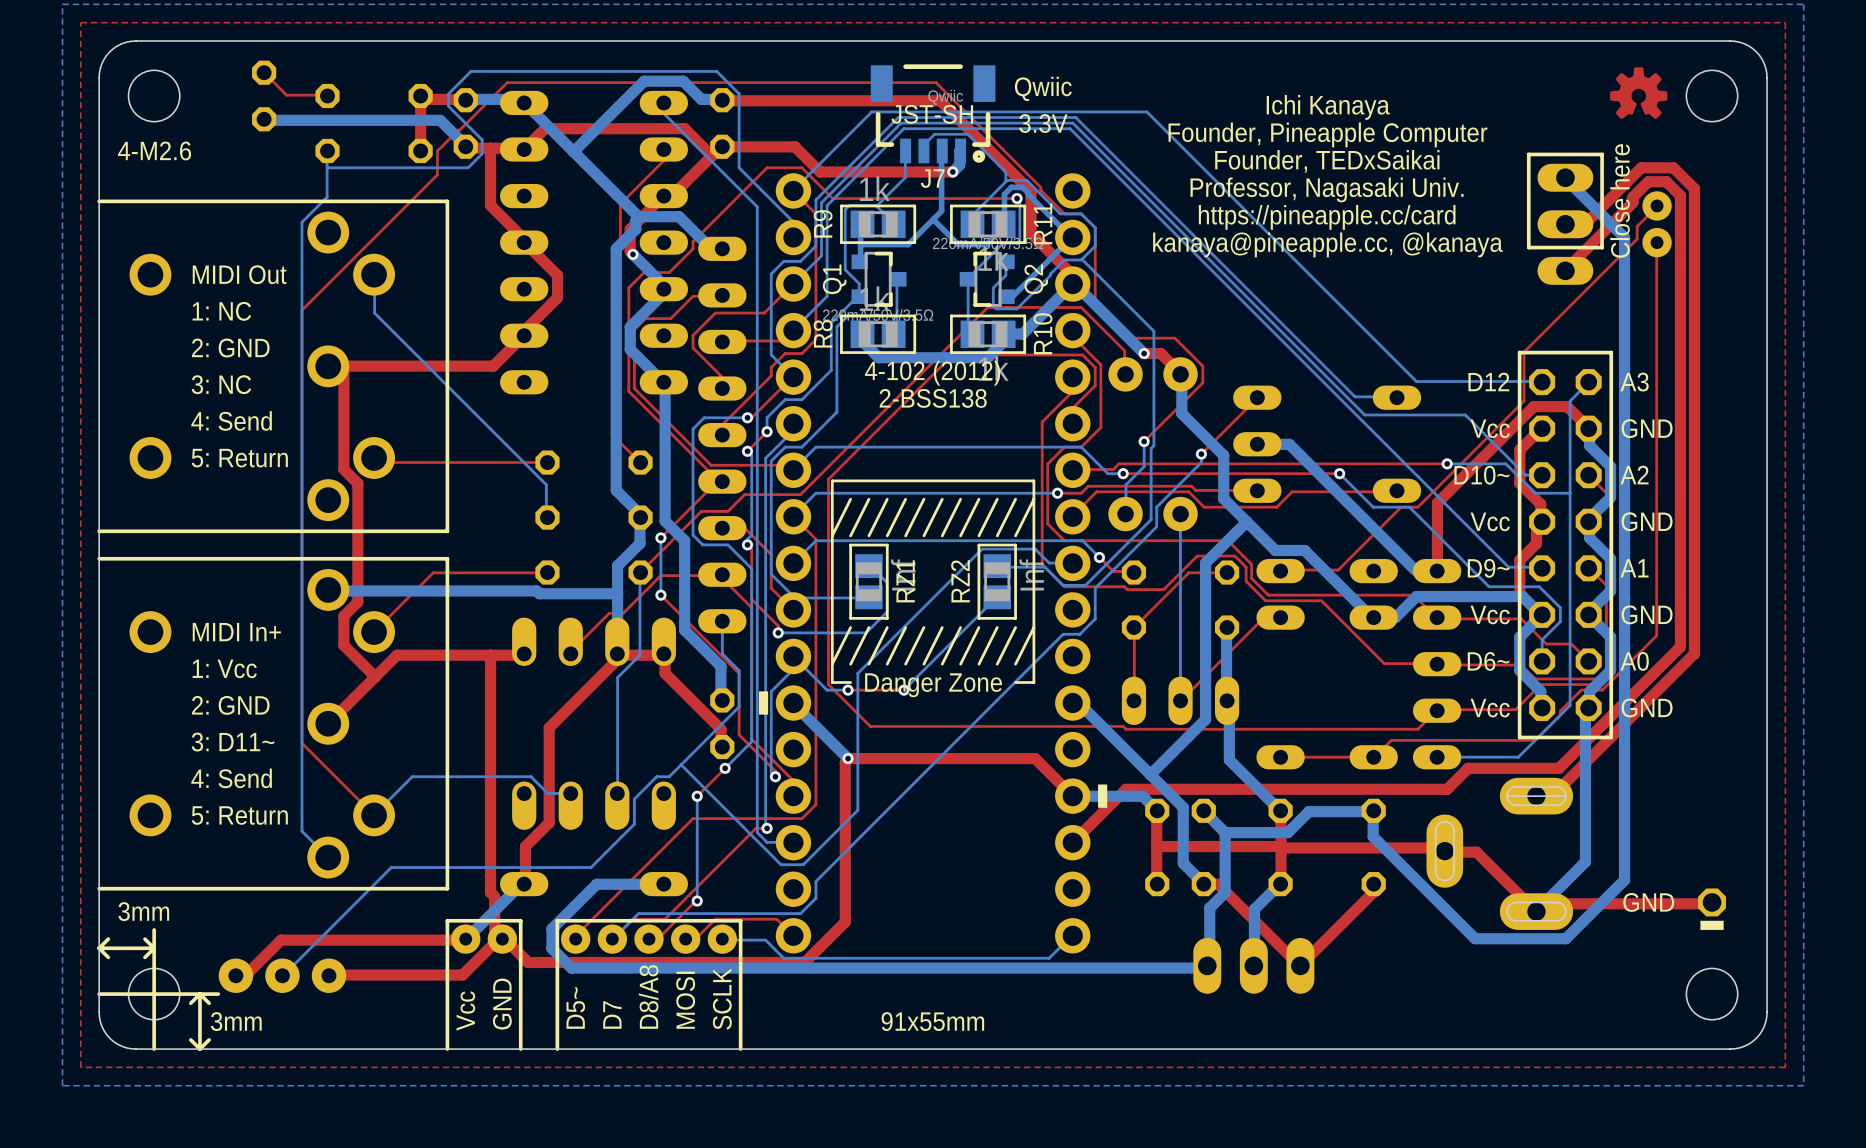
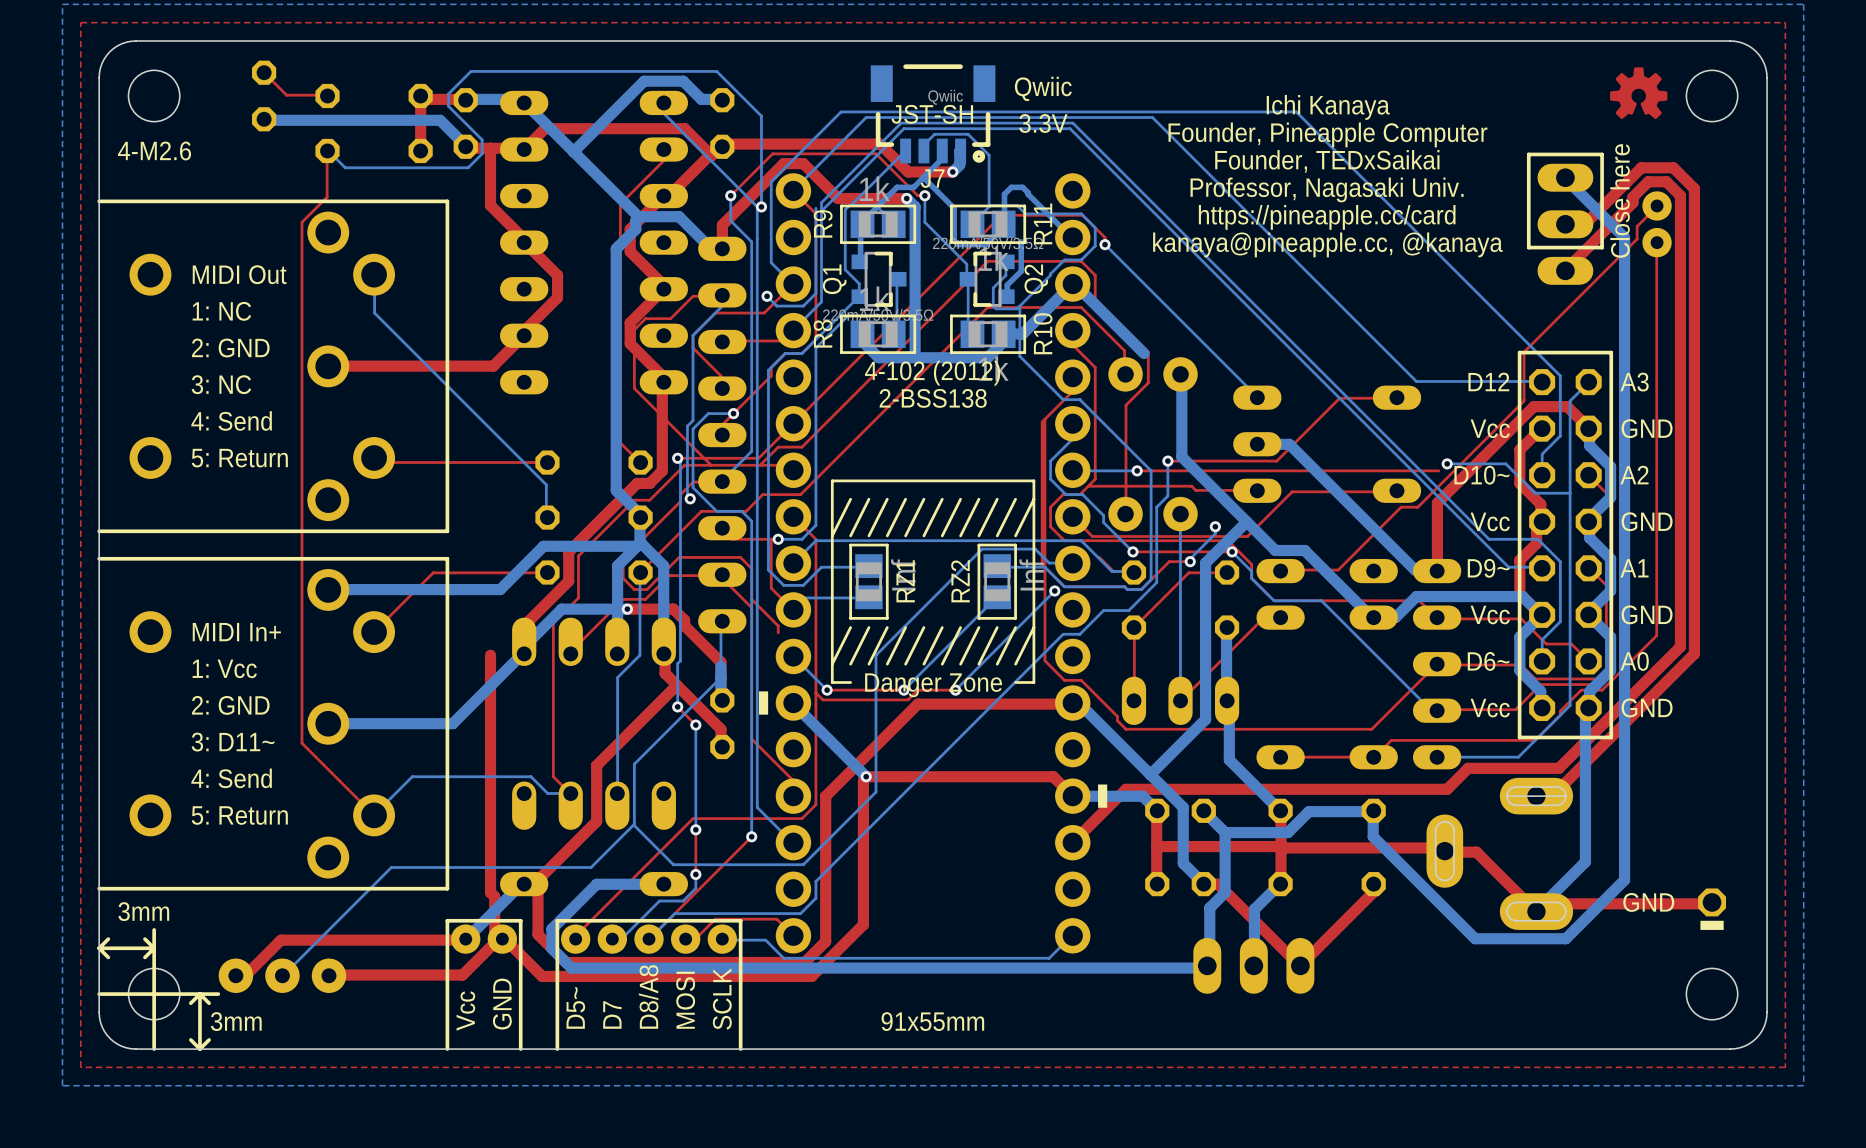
bottom track: (739, 93) (739, 167) (792, 220) (793, 237) -> (739, 93) (761, 116) (761, 206)
top track: (722, 100) (940, 100) (1031, 191) (1031, 233) (1071, 273) (1072, 284) -> none
bottom track: (871, 111) (866, 117) -> (898, 117) (866, 117)
bottom track: none -> (871, 111) (841, 111) (771, 181) (771, 262) (793, 284)
bottom track: (1146, 111) (1152, 117) -> (1075, 117) (1152, 117)
bottom track: (898, 117) (815, 199) (815, 208) -> none
bottom track: (1075, 117) (1355, 396) (1396, 397) -> none
bottom track: (327, 150) (327, 197) (301, 222) (301, 831) (328, 857) -> none
top track: none -> (327, 150) (327, 197) (301, 222) (301, 310)
bottom track: (905, 151) (905, 177) (876, 206) -> (905, 151) (850, 205)
bottom track: (989, 155) (1005, 171) (1006, 181) -> (989, 155) (989, 206)
bottom track: (941, 159) (941, 211) (908, 244) (860, 244) -> (941, 159) (913, 187) (896, 187) (862, 222) (862, 224)
bottom track: (345, 167) (327, 167) -> (345, 167) (327, 150)
top track: (908, 171) (820, 171) (794, 146) (722, 146) (672, 195) (669, 195) -> (908, 171) (880, 144) (723, 144) (722, 146) (716, 148) (669, 195)
bottom track: none -> (730, 195) (730, 220) (751, 241) (751, 451) (722, 481)
via: none -> (730, 195)
top track: none -> (924, 195) (917, 195) (875, 153) (772, 153) (730, 195)
via: none -> (924, 195)
top track: (838, 198) (832, 198) (801, 167) (767, 167) (693, 241) (693, 248) (669, 272) (644, 272) (628, 287) (628, 391) (718, 480) (660, 537) -> (838, 198) (803, 163) (783, 163) (722, 225) (722, 248)
bottom track: none -> (906, 198) (915, 206) (915, 357)
top track width: thin (906, 198) (838, 198) -> thick (906, 198) (838, 198)
via: none -> (906, 198)
bottom track: (1017, 198) (1019, 201) (1019, 240) (1017, 243) (1003, 243) (967, 279) -> (924, 195) (924, 222) (966, 264) (967, 279)
top track: (1017, 198) (906, 198) -> none
via: (1017, 198) -> none
bottom track: (827, 205) (827, 296) (821, 301) -> (827, 205) (821, 211)
via: none -> (761, 206)
bottom track: (1060, 213) (1026, 180) (1007, 180) (973, 213) (972, 224) -> (1060, 213) (1025, 213) (1017, 205) (990, 205) (972, 224)
top track: (1082, 215) (1064, 213) (1040, 190) (1040, 187) (936, 82) (507, 82) (437, 151) (437, 174) (301, 310) -> (1082, 215) (1001, 215) (793, 423)
bottom track: (933, 219) (954, 240) -> (923, 177) (954, 208) (954, 240)
top track: (1095, 227) (1095, 275) -> (1095, 227) (1105, 237) (1105, 244)
bottom track: (1068, 240) (1012, 296) (1007, 296) -> (1021, 241) (1021, 271) (1007, 285) (1007, 296)
bottom track: none -> (1105, 244) (1257, 397)
via: none -> (1105, 244)
bottom track: (815, 246) (800, 261) (783, 261) (771, 273) (771, 354) (793, 377) -> (815, 246) (815, 293) (803, 306) (776, 306) (767, 296)
bottom track: (632, 254) (662, 283) (663, 289) -> none
top track: none -> (632, 254) (662, 283) (663, 289)
via: (632, 254) -> none
bottom track: (821, 255) (793, 283) -> (821, 255) (821, 301)
bottom track: (1081, 259) (1153, 331) (1153, 445) (1151, 448) (1151, 470) -> (1019, 306) (1019, 356) (1063, 399) (1079, 399) (1151, 470)
top track: none -> (1095, 275) (1081, 261) (987, 261) (801, 447) (778, 447) (760, 465)
bottom track: (663, 289) (663, 293) (630, 327) (630, 349) (665, 382) (665, 521) (684, 540) (684, 630) (720, 666) -> (722, 621) (720, 666)
bottom track: none -> (722, 295) (720, 307) (693, 335) (693, 420) (687, 426) (687, 496) (690, 498)
via: none -> (767, 296)
bottom track: (859, 296) (857, 296) (831, 322) (831, 370) (801, 399) (785, 399) (767, 417) (767, 431) -> (859, 296) (801, 353) (785, 353) (768, 370) (768, 570) (783, 585) (803, 585) (821, 567) (868, 566)
bottom track: (836, 327) (836, 412) (801, 447) (785, 447) (771, 461) (771, 574) (799, 602) (793, 609) -> (836, 327) (815, 347) (815, 525) (801, 539) (778, 539)
top track: (1072, 336) (1100, 364) (1100, 427) (1081, 447) (1064, 447) (1047, 463) (1047, 523) (1050, 526) -> (1072, 336) (1072, 345) (1082, 354)
top track: (1134, 338) (1174, 338) (1202, 366) (1202, 382) (1144, 441) -> (1134, 338) (1148, 352) (1148, 382) (1125, 405) (1125, 514)
top track: (1144, 353) (1160, 353) (1180, 374) -> none
via: (1144, 353) -> none
top track: (1082, 354) (952, 354) (828, 479) (828, 684) (870, 726) (1123, 726) -> (1044, 419) (1044, 660) (1064, 680) (1081, 680) (1117, 716) (1117, 720) (1123, 726)
top track: (328, 366) (343, 370) (343, 469) (357, 483) (357, 602) (343, 616) (343, 645) (375, 676) -> none
top track: (792, 377) (751, 417) (747, 417) -> none
top track: (1095, 385) (1072, 408) (1072, 423) -> (1095, 385) (1095, 479) (1088, 486)
top track: (1257, 397) (1201, 454) -> none
top track: none -> (1396, 397) (1339, 398) (1276, 461) (1167, 461)
bottom track: (1181, 413) (1223, 455) (1223, 498) -> (1181, 413) (1181, 456) (1223, 498)
bottom track: (1364, 415) (1465, 415) (1525, 475) (1542, 475) -> (1146, 111) (1296, 111) (1560, 375) (1560, 435) (1542, 454) (1542, 475)
bottom track: (747, 417) (704, 417) -> (733, 413) (708, 413) (704, 417)
via position: (747, 417) -> (733, 413)
bottom track: (793, 423) (792, 431) (765, 458) (767, 828) -> none
top track: none -> (793, 423) (758, 458) (677, 458)
bottom track: none -> (1072, 423) (1071, 440) (1050, 461) (1050, 479) (1065, 494) (1082, 494) (1103, 515) (1103, 522) (1132, 551)
top track: (767, 431) (747, 451) -> none
via: (767, 431) -> none
bottom track: (1144, 441) (1144, 466) (1125, 484) (1125, 514) -> none
via: (1144, 441) -> none
bottom track: (747, 451) (751, 455) (751, 521) -> none
via: (747, 451) -> none
bottom track: (1201, 454) (1201, 462) (1167, 496) -> (1167, 461) (1167, 496)
via: (1201, 454) -> none
bottom track: none -> (677, 458) (680, 461) (680, 660) (677, 663) (677, 706)
via: none -> (677, 458)
via: none -> (1167, 461)
top track: (1447, 463) (1119, 463) (1113, 469) (1072, 470) -> none
top track: none -> (711, 465) (684, 465) (649, 500) (634, 500) (578, 556) (578, 597) (553, 623) (553, 776) (570, 793)
bottom track: (793, 470) (815, 447) (1081, 447) (1107, 473) (1123, 473) -> none
bottom track: none -> (1072, 470) (1137, 470)
top track: none -> (1438, 470) (1137, 470)
via position: (1123, 473) -> (1137, 470)
bottom track: (1339, 473) (1373, 507) (1409, 507) (1489, 586) (1539, 586) (1560, 607) -> (1364, 415) (1489, 539) (1537, 539) (1560, 561) (1560, 607)
top track: (1339, 473) (1123, 473) -> none
via: (1339, 473) -> none
top track: none -> (722, 481) (693, 482) (680, 494) (680, 501) (623, 558) (623, 578) (634, 589) (646, 589)
bottom track: (693, 487) (693, 535) (702, 544) (727, 544) (751, 568) -> (693, 487) (716, 511) (741, 511) (751, 521)
bottom track: (1057, 493) (815, 493) (793, 516) -> none
via: (1057, 493) -> none
top track: (1081, 493) (1057, 493) -> (1081, 493) (1063, 494) (1050, 507) (1050, 526)
top track: (762, 494) (744, 494) (727, 511) -> (762, 494) (746, 511) (727, 511)
via: none -> (690, 498)
top track: (1276, 507) (1204, 507) (1188, 491) (1096, 491) (1072, 516) -> (1276, 507) (1247, 536) (1092, 536) (1072, 516)
bottom track: (1151, 519) (1085, 585) (1063, 585) -> (1151, 519) (1151, 579) (1141, 589) (1127, 589) (1124, 586) (1063, 585)
bottom track: (1156, 526) (1095, 588) (1095, 618) -> (1156, 526) (1156, 582) (1128, 610) (1103, 610) (1095, 618)
bottom track: none -> (1215, 526) (1215, 533) (1190, 558) (1190, 561)
via: none -> (1215, 526)
top track: (722, 529) (746, 529) (771, 554) -> (722, 529) (732, 539) (778, 539)
bottom track: (751, 535) (747, 539) (747, 544) -> (751, 535) (751, 568)
bottom track: (660, 537) (660, 595) -> none
via: (660, 537) -> none
top track: none -> (771, 539) (771, 554)
bottom track: (1081, 540) (1099, 557) -> (1081, 540) (1112, 571) (1133, 572)
top track: (747, 544) (751, 549) (751, 568) -> none
via position: (747, 544) -> (778, 539)
via: none -> (1132, 551)
bottom track: none -> (1232, 551) (1251, 571) (1251, 578) (1274, 600) (1321, 600) (1430, 709) (1437, 710)
top track: none -> (1232, 551) (1132, 551)
via: none -> (1232, 551)
via: (1099, 557) -> none
via: none -> (1190, 561)
bottom track: (868, 566) (887, 582) (887, 611) (866, 632) (778, 632) -> none
top track: (669, 575) (660, 575) -> (751, 568) (740, 557) (679, 557) (660, 575)
bottom track: (328, 589) (536, 590) (539, 593) (617, 593) -> (328, 589) (500, 589) (543, 546) (637, 546) (641, 543) (663, 565) (663, 653)
top track: (646, 589) (623, 613) (609, 613) -> (669, 575) (645, 599) (623, 599) (609, 613)
top track: (1141, 589) (1163, 589) (1197, 556) (1234, 556) (1246, 567) (1246, 581) (1265, 600) (1274, 600) -> (1141, 589) (1169, 561) (1190, 561)
bottom track: none -> (1054, 590) (955, 690)
via: none -> (1054, 590)
top track: (660, 595) (739, 673) (739, 734) (775, 771) (775, 776) -> none
via position: (660, 595) -> (627, 609)
top track: (1268, 595) (1413, 595) (1419, 600) -> (1321, 600) (1419, 600)
top track: (1321, 600) (1384, 663) (1437, 664) -> none
bottom track: none -> (627, 609) (561, 609) (525, 645) (525, 653) (519, 656) (452, 723) (328, 723)
top track: none -> (627, 609) (673, 609) (684, 620) (684, 625) (720, 662) (722, 700)
bottom track: (722, 621) (722, 653) (739, 670) (739, 706) (669, 776) (656, 776) (634, 799) -> (720, 677) (634, 764) (634, 799)
via: (778, 632) -> none
top track: (524, 653) (396, 655) (328, 723) -> (524, 653) (525, 624) (568, 581) (568, 551) (637, 483) (649, 483) (662, 470) (663, 377) (630, 343) (630, 322) (663, 289)
top track: (663, 653) (617, 653) (616, 660) (549, 727) (549, 822) (525, 846) (525, 882) -> (676, 685) (596, 765) (596, 821) (535, 882) (525, 882)
bottom track: (875, 655) (857, 673) (857, 810) -> (875, 655) (875, 792) (857, 810)
bottom track: (793, 656) (799, 663) (771, 691) (771, 772) (775, 776) -> none
bottom track: (848, 690) (827, 690) -> none
top track: none -> (848, 690) (827, 690)
via position: (848, 690) -> (827, 690)
top track: none -> (955, 690) (917, 690) (908, 699) (822, 699) (815, 692)
via: none -> (955, 690)
top track: none -> (677, 706) (695, 725)
via: none -> (677, 706)
top track: (1437, 710) (1417, 729) (1371, 729) -> (1437, 664) (1371, 729)
via: none -> (695, 725)
bottom track: (751, 741) (725, 768) -> (751, 741) (751, 836)
bottom track: none -> (848, 758) (866, 776)
via position: (848, 758) -> (866, 776)
bottom track: (681, 764) (781, 864) -> (633, 824) (673, 864) (781, 864)
top track: (725, 768) (697, 796) -> none
via: (725, 768) -> none
via: (775, 776) -> none
top track: (1053, 776) (1035, 758) (848, 758) (845, 762) (845, 921) (825, 941) -> (1072, 703) (917, 704) (825, 796) (825, 941)
top track: none -> (1053, 776) (866, 776) (863, 780) (863, 924) (811, 976) (542, 976) (528, 962)
bottom track: (697, 796) (697, 901) -> (695, 725) (695, 829)
via position: (697, 796) -> (695, 829)
bottom track: (757, 807) (757, 832) (767, 842) (792, 842) -> (757, 807) (792, 842)
top track: (767, 828) (755, 828) (665, 919) (632, 919) (612, 939) -> none
via position: (767, 828) -> (751, 836)
top track: none -> (695, 829) (695, 874)
bottom track: none -> (695, 874) (695, 888) (683, 901) (659, 901) (621, 938) (613, 938)
top track: (697, 901) (658, 938) (649, 938) -> (751, 836) (649, 938)
via position: (697, 901) -> (695, 874)
bottom track: (674, 913) (638, 913) (613, 938) -> (674, 913) (649, 939)
top track: (565, 962) (528, 962) -> (565, 962) (538, 934) (538, 887) (524, 884)

